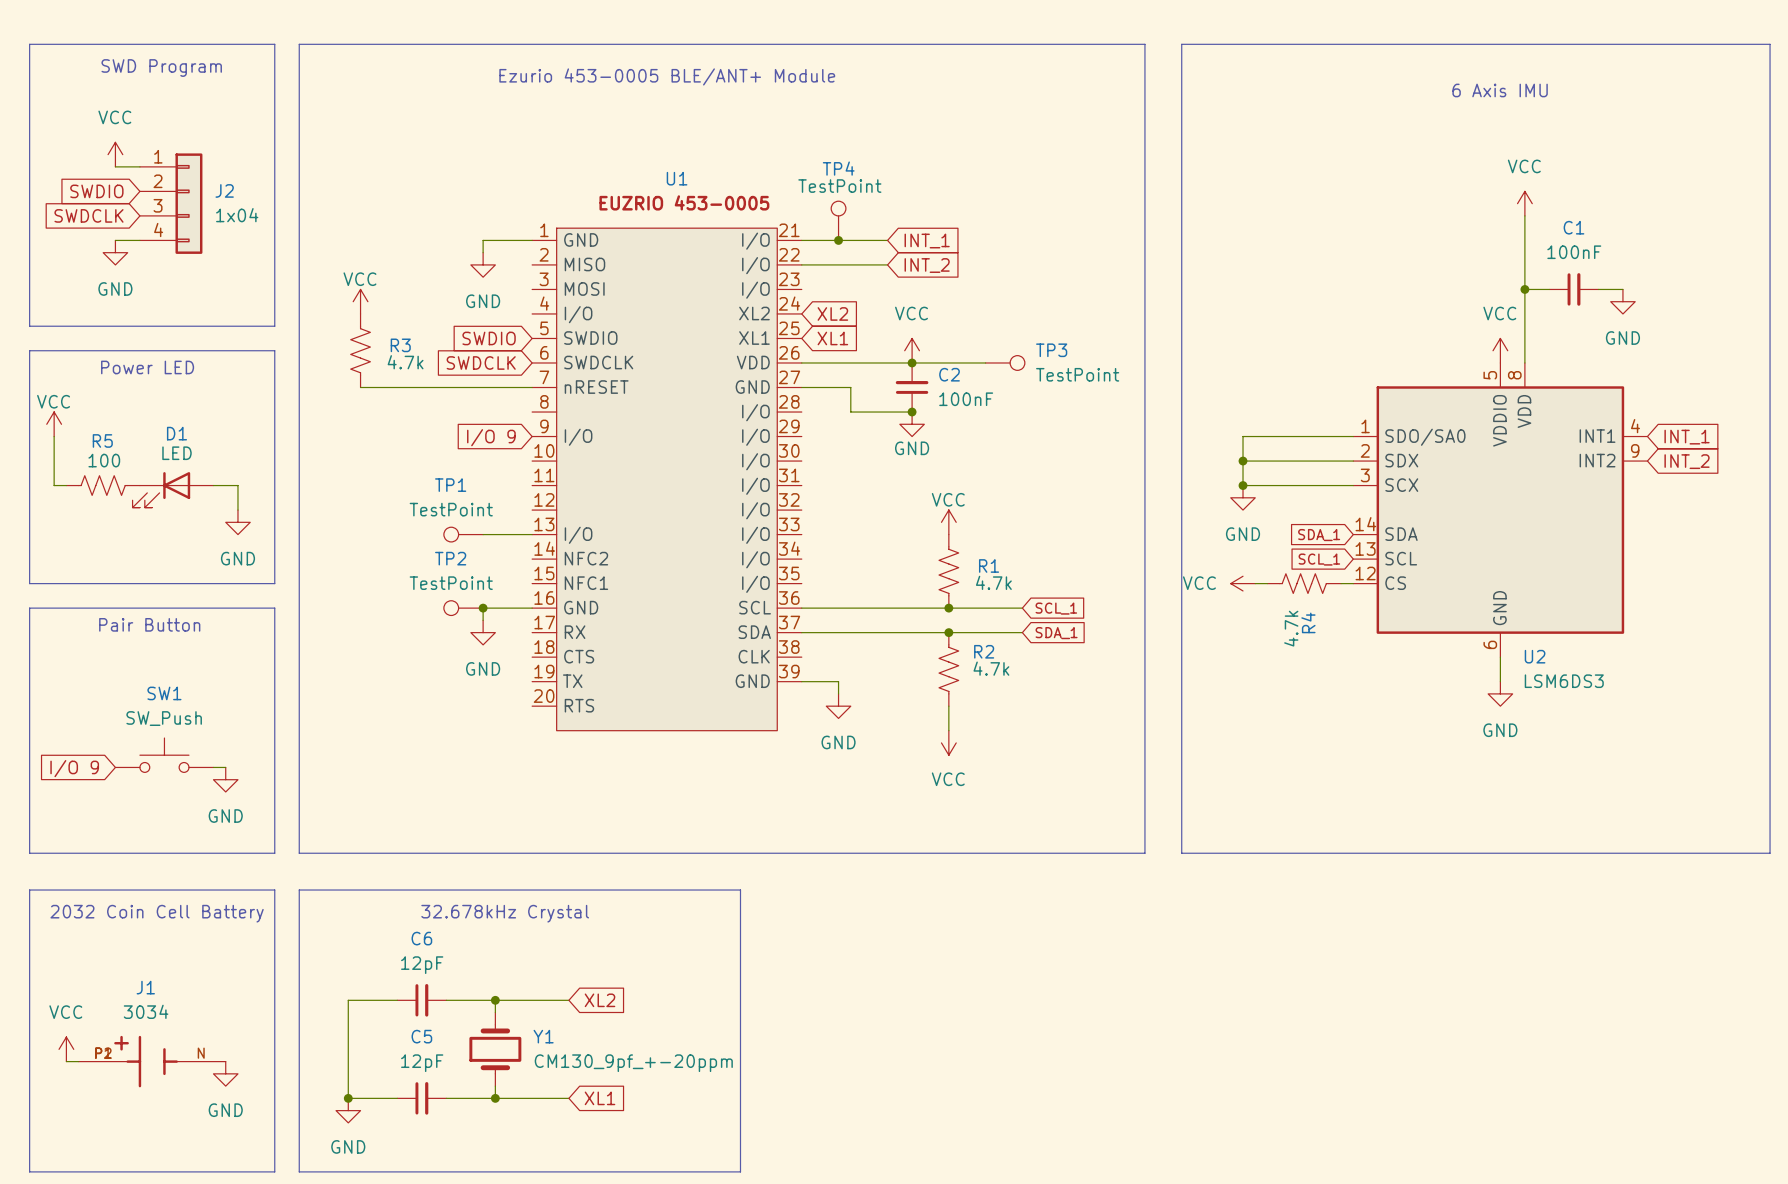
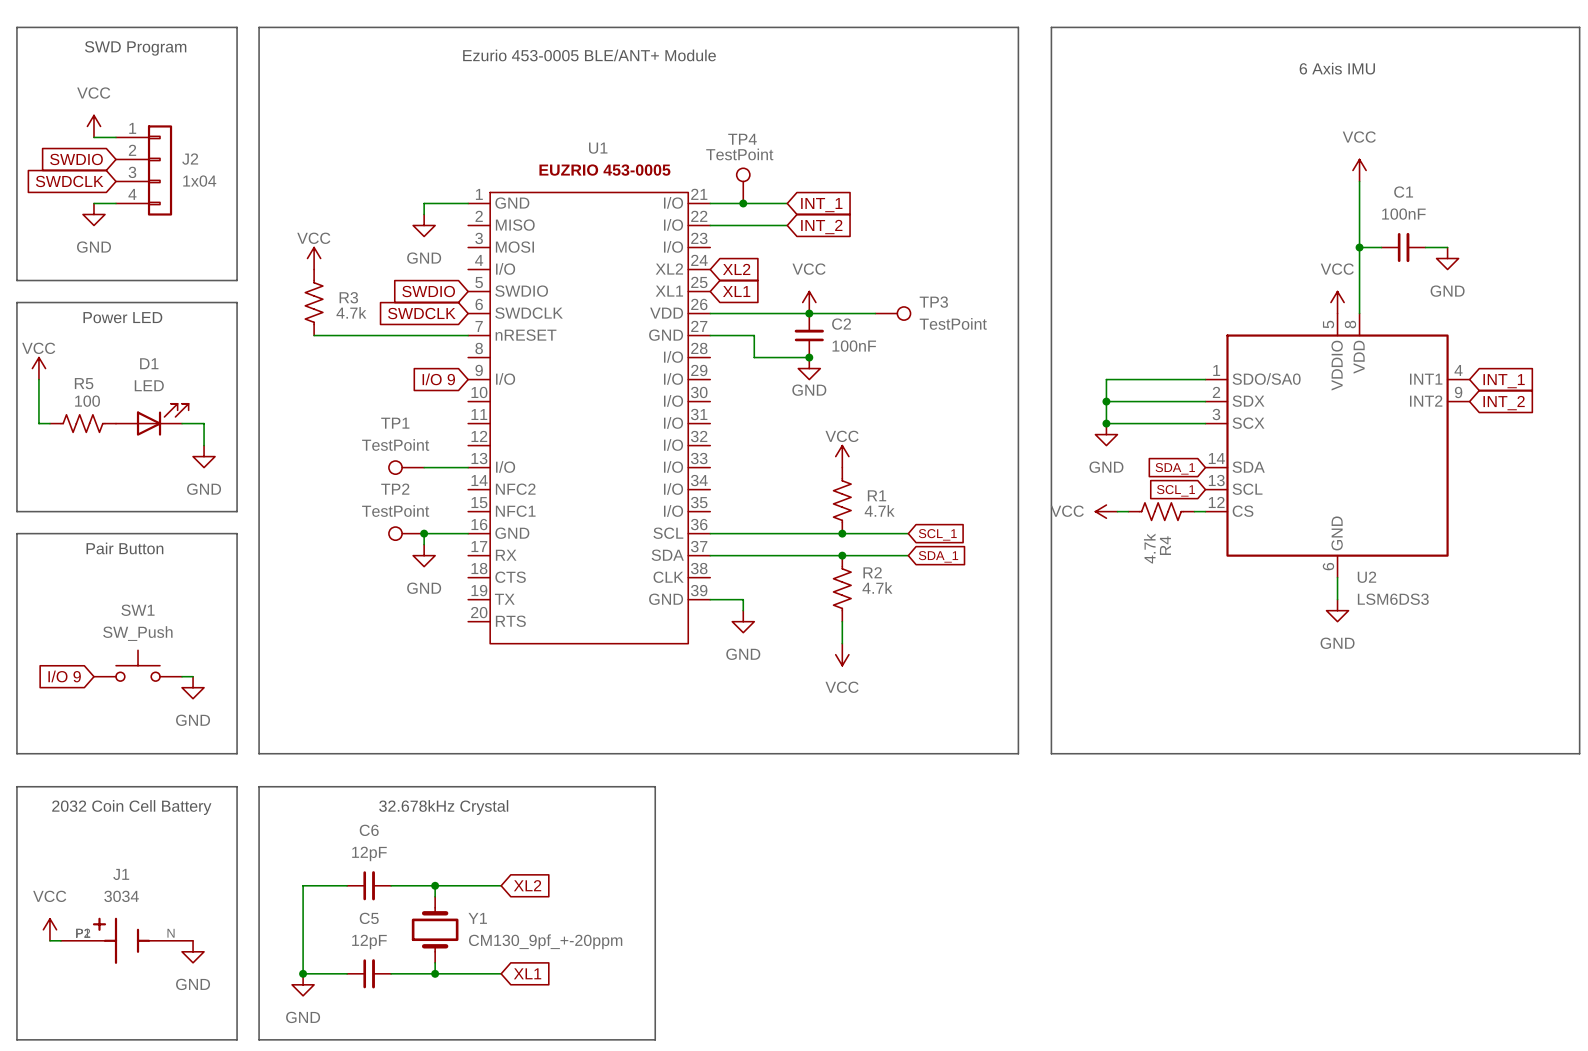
D1 rotation: 0° (161, 489) -> 180° (162, 419)

